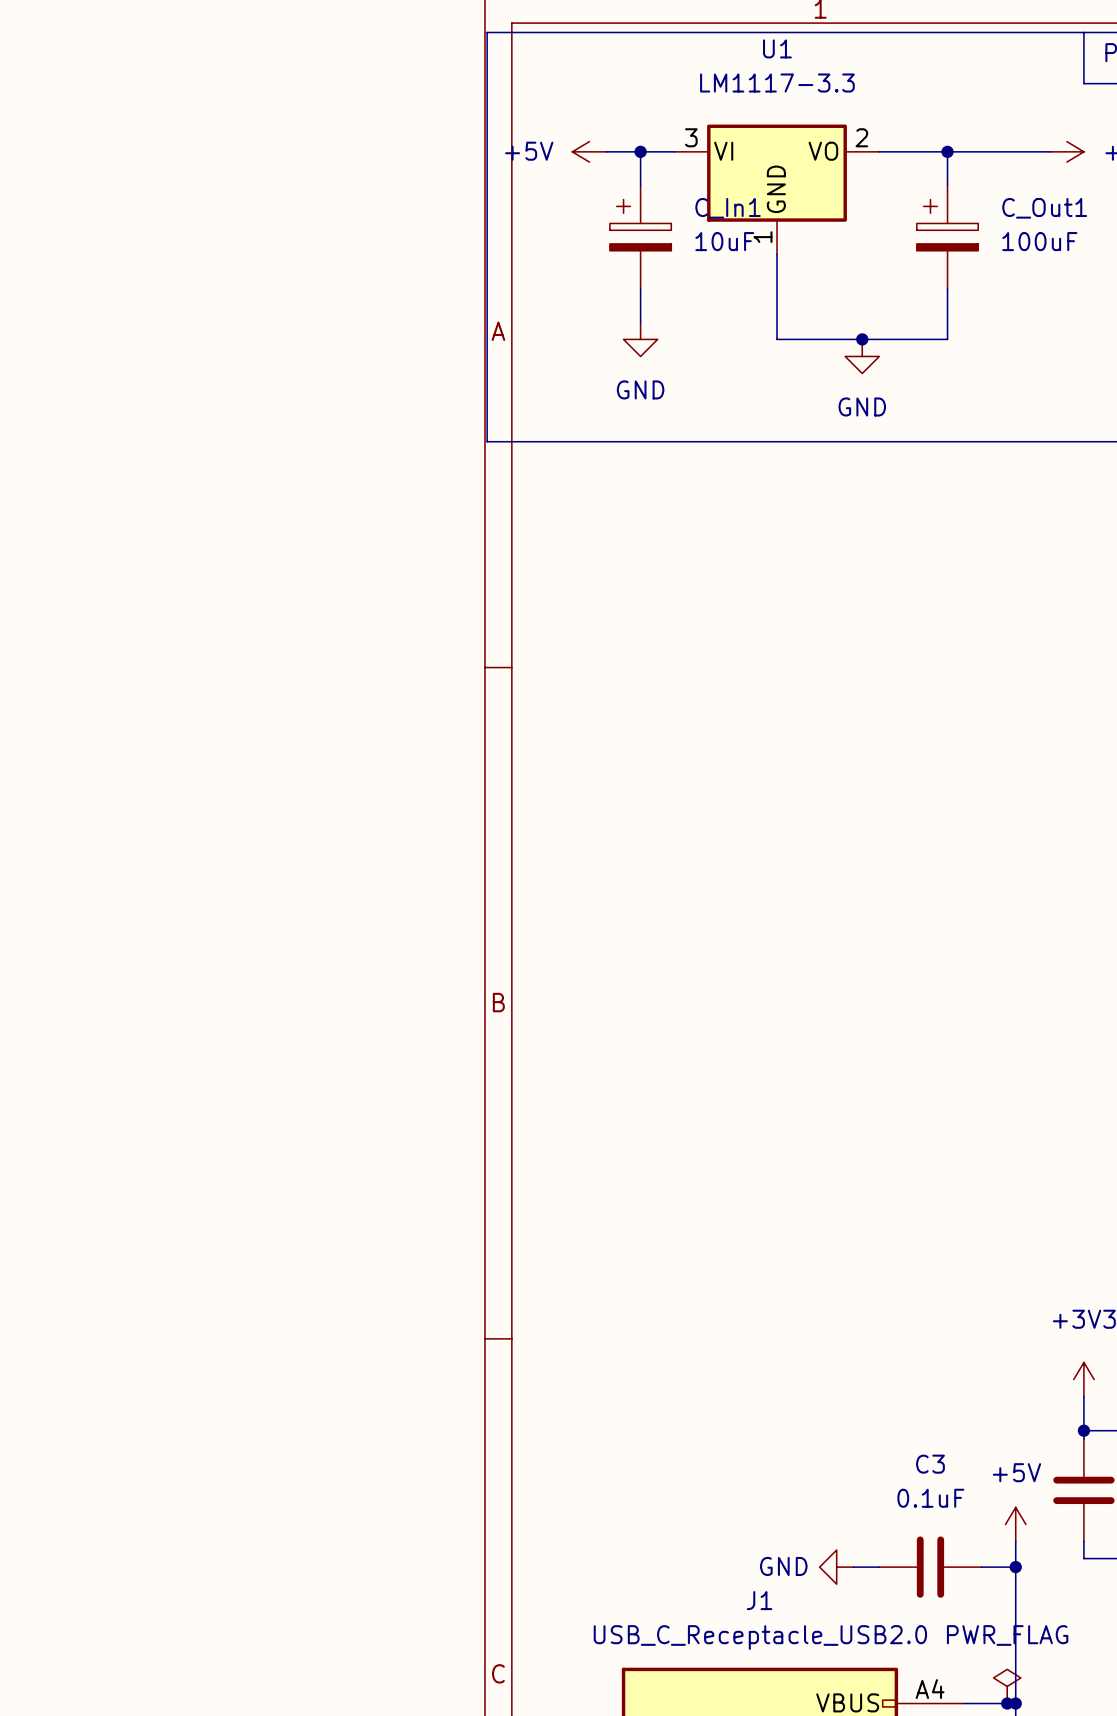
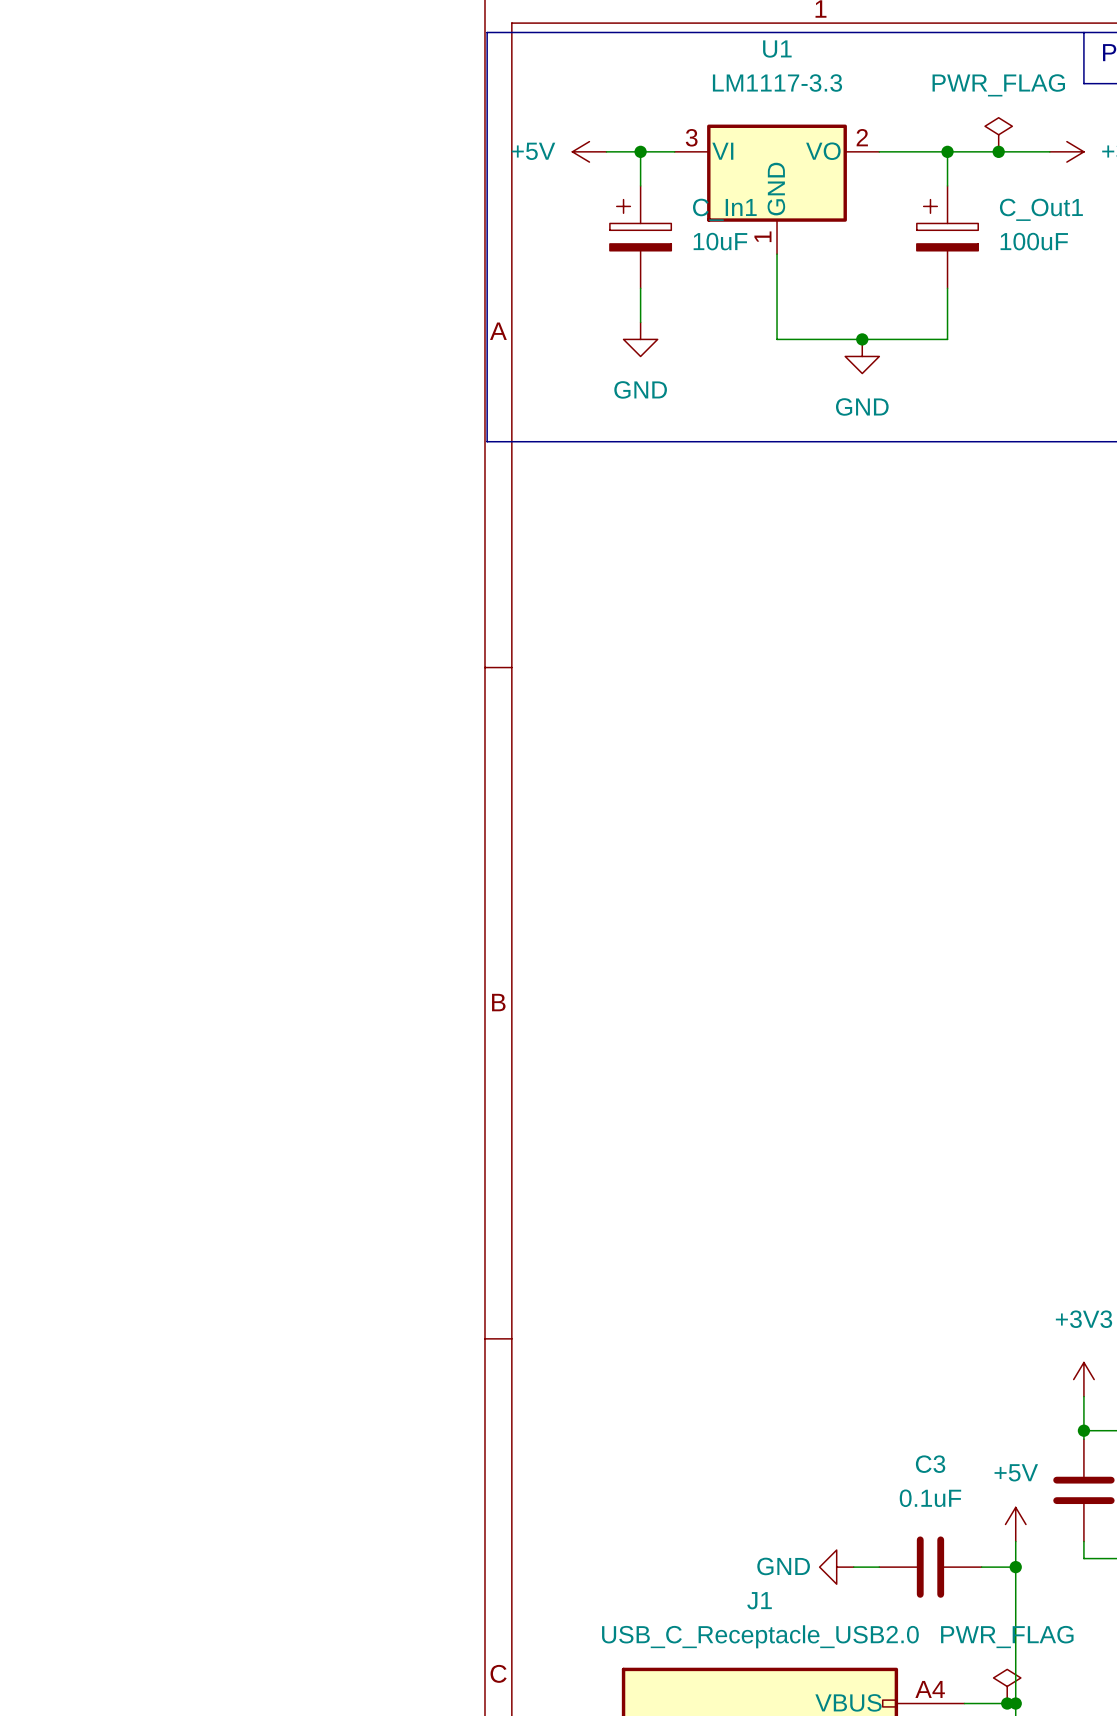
power symbol: none -> PWR_FLAG (998, 134)
junction: none -> (998, 151)

